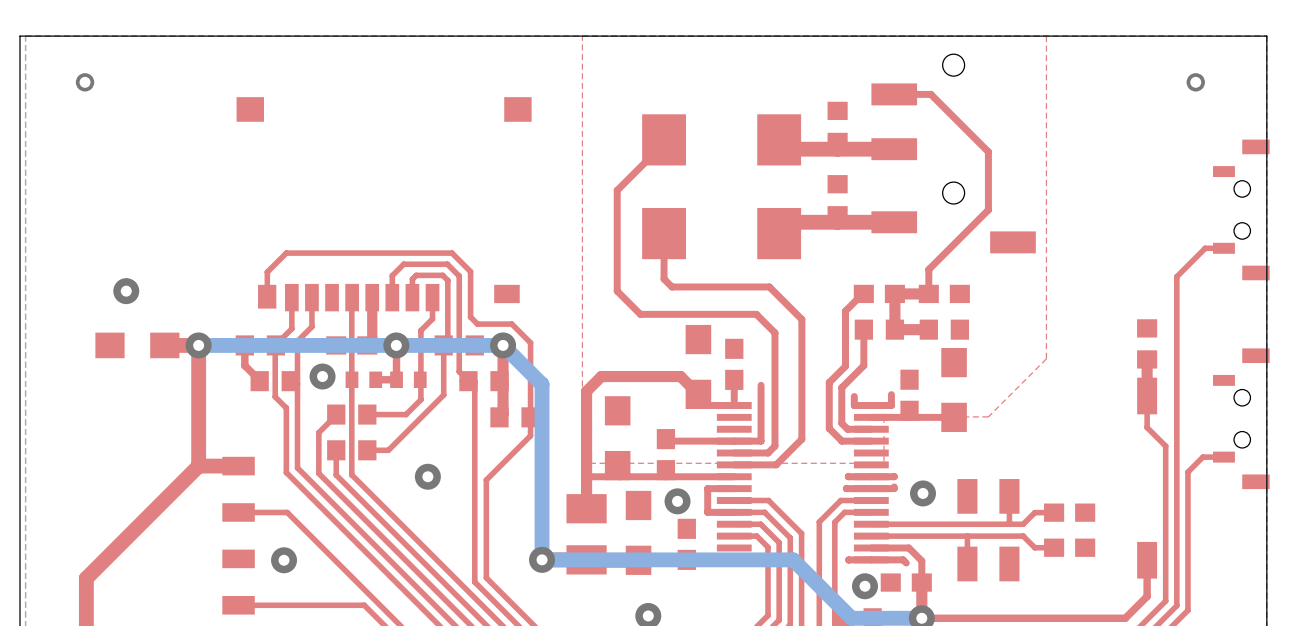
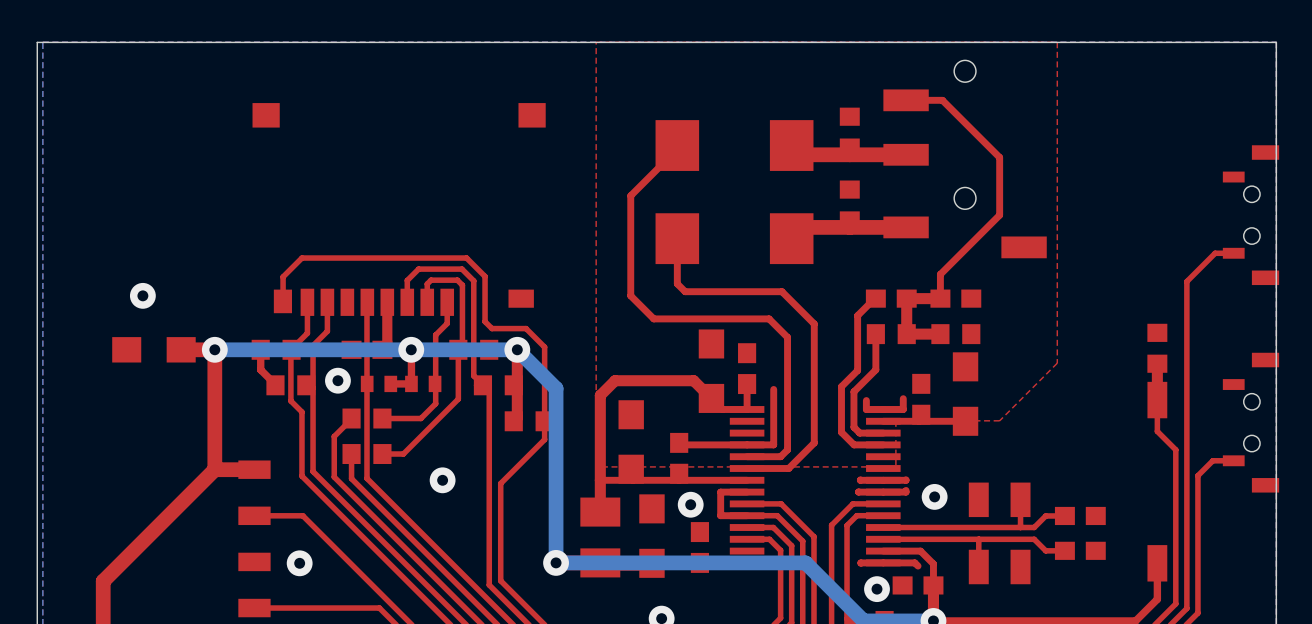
via: (85, 82) -> none
via: (1195, 82) -> none

